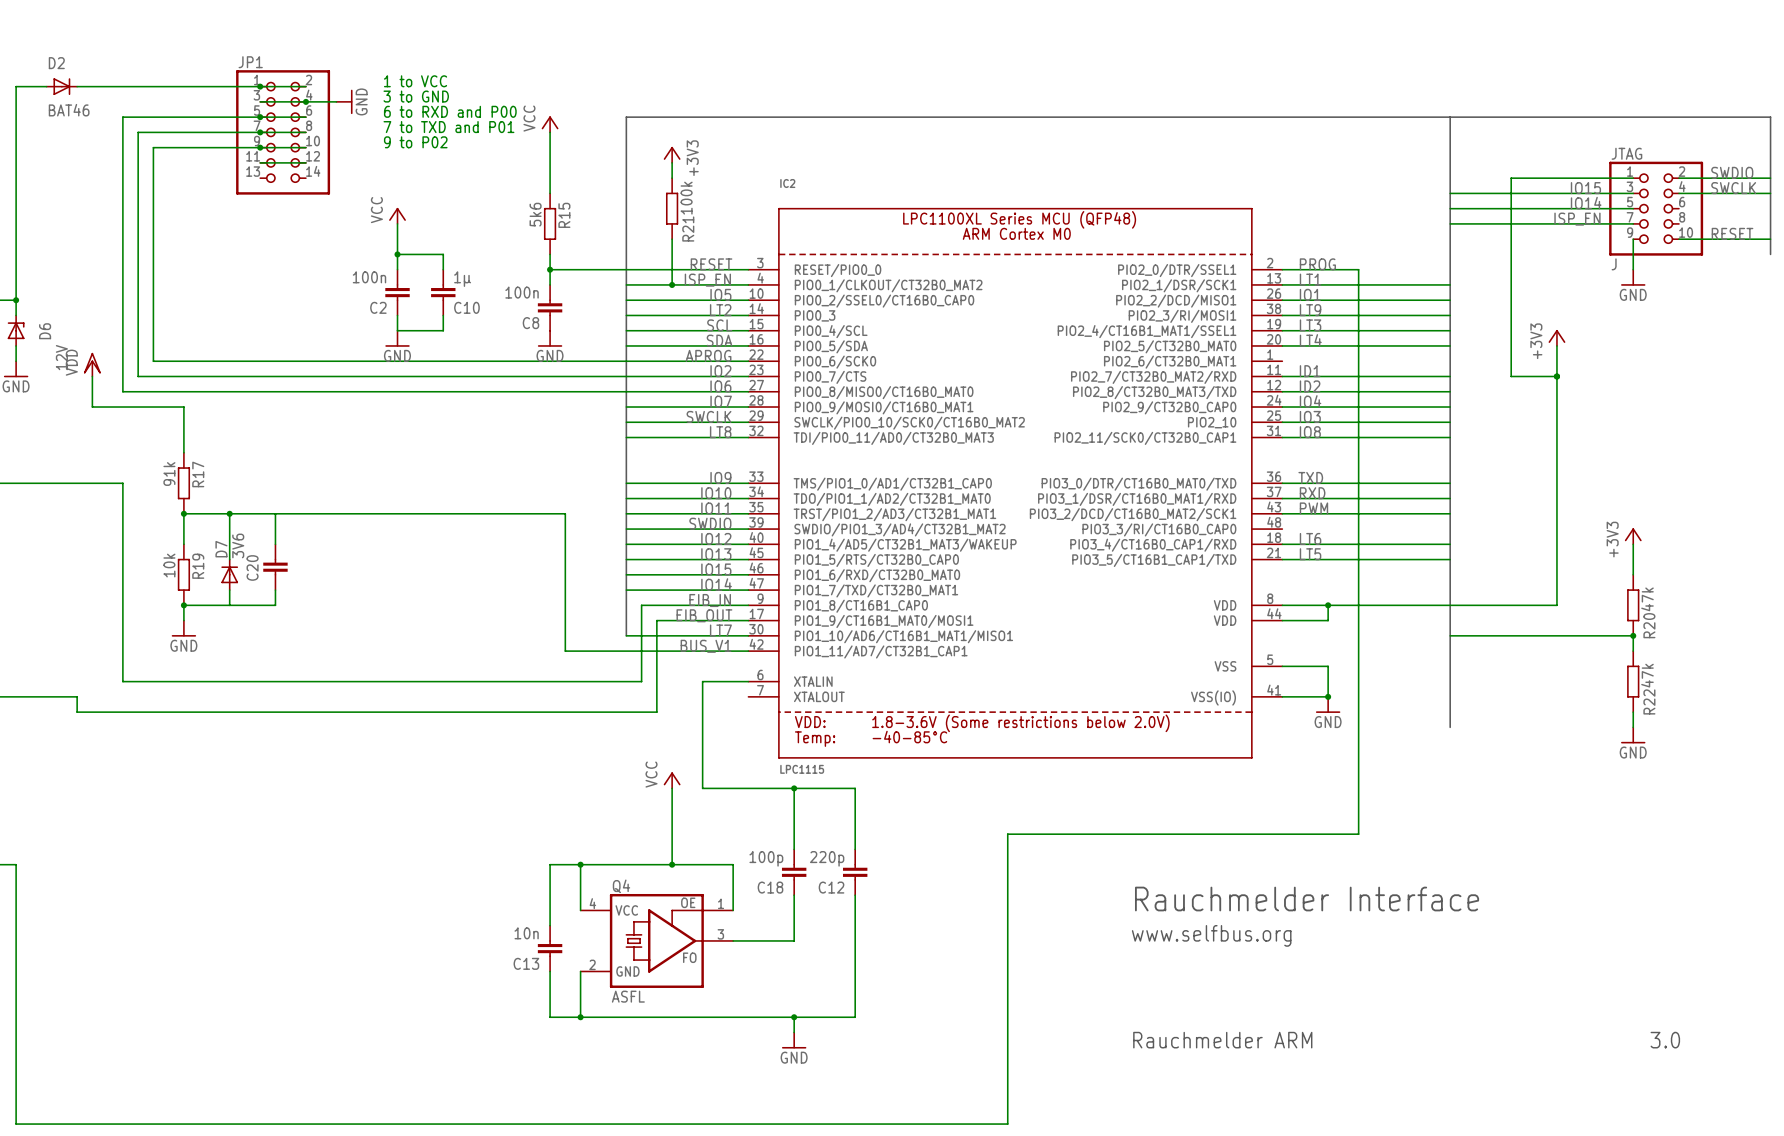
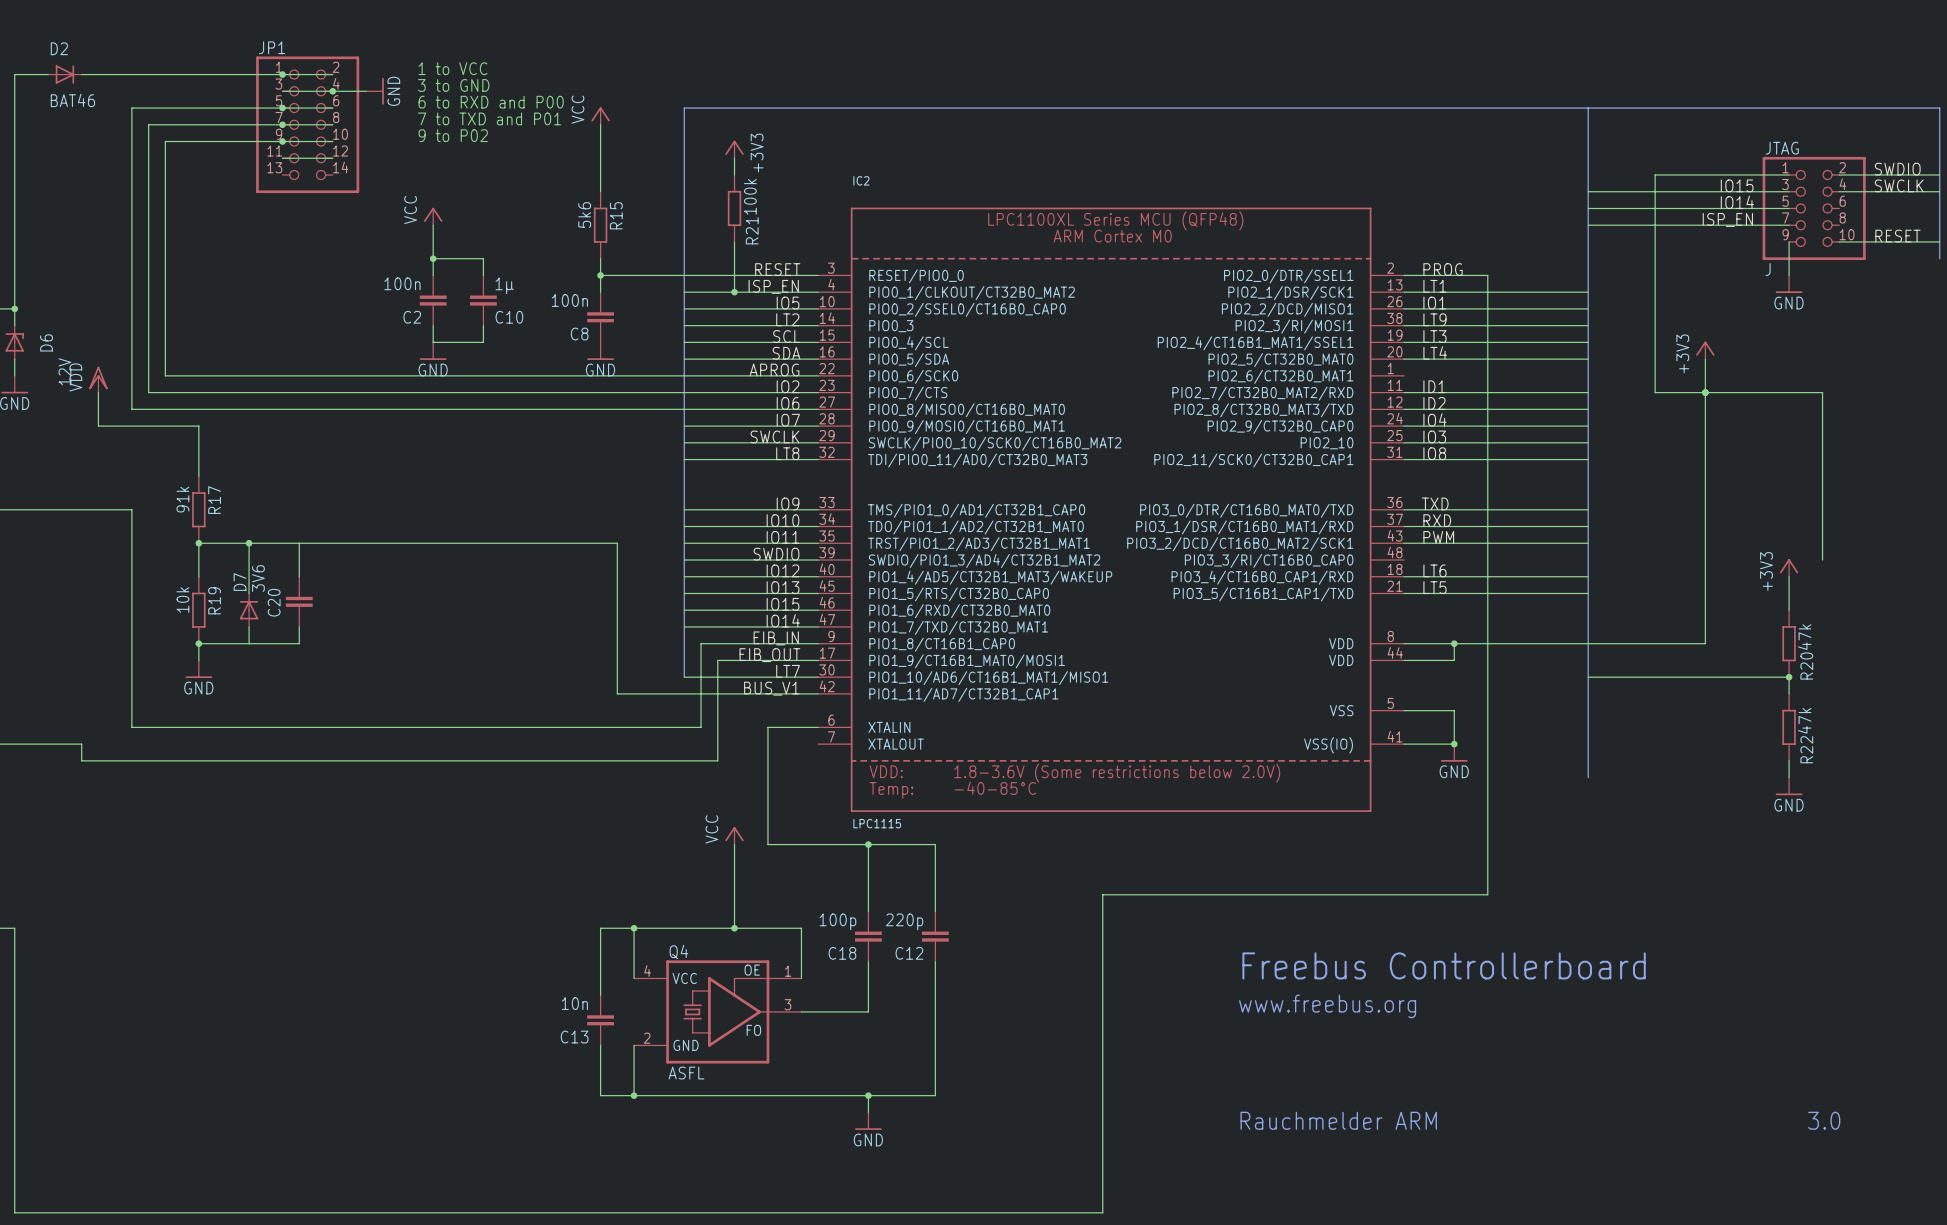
wire: none -> (1705, 392) (1822, 392) (1822, 559)
text: Rauchmelder Interface (1307, 899) -> Freebus Controllerboard (1444, 965)
text: www.selfbus.org (1211, 935) -> www.freebus.org (1327, 1006)

